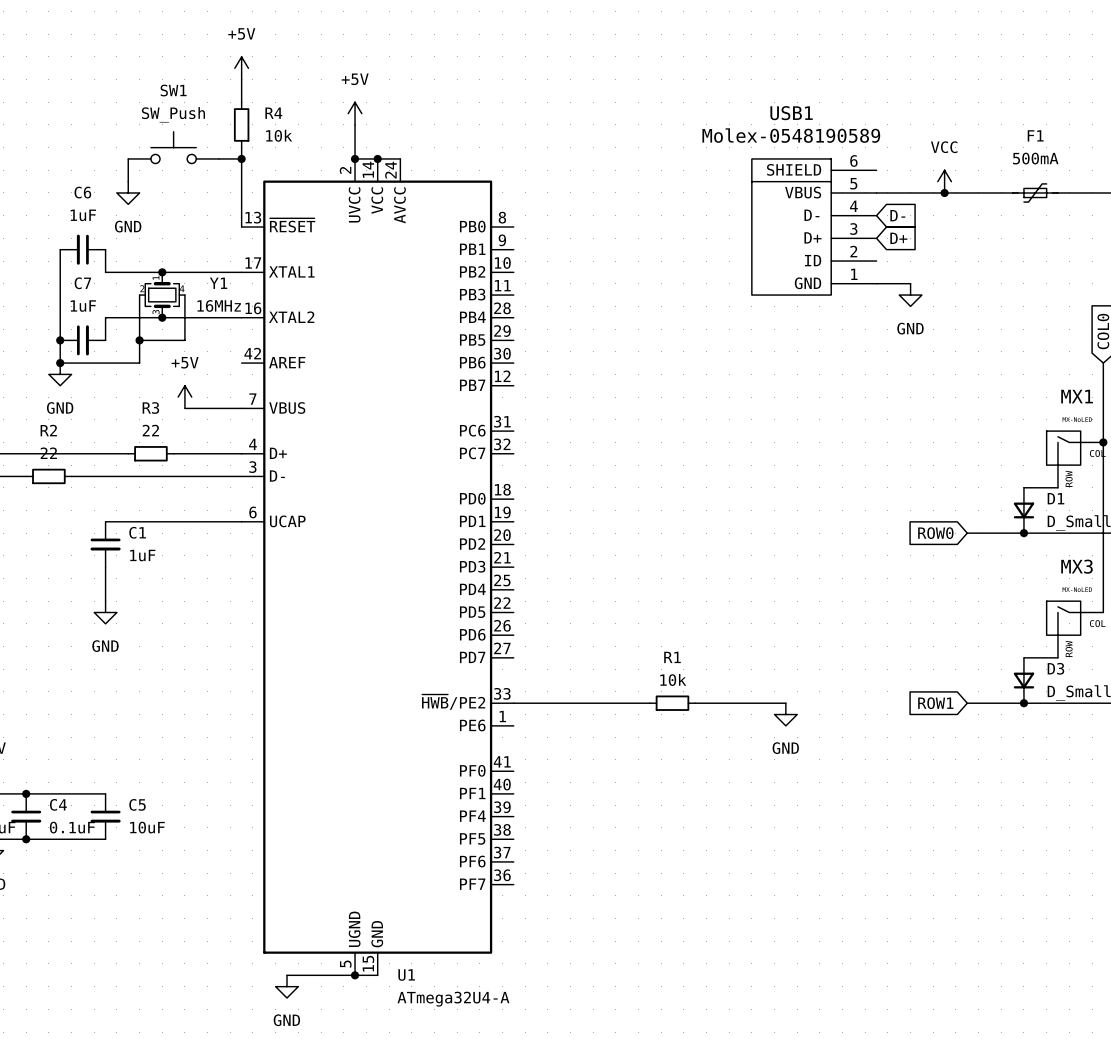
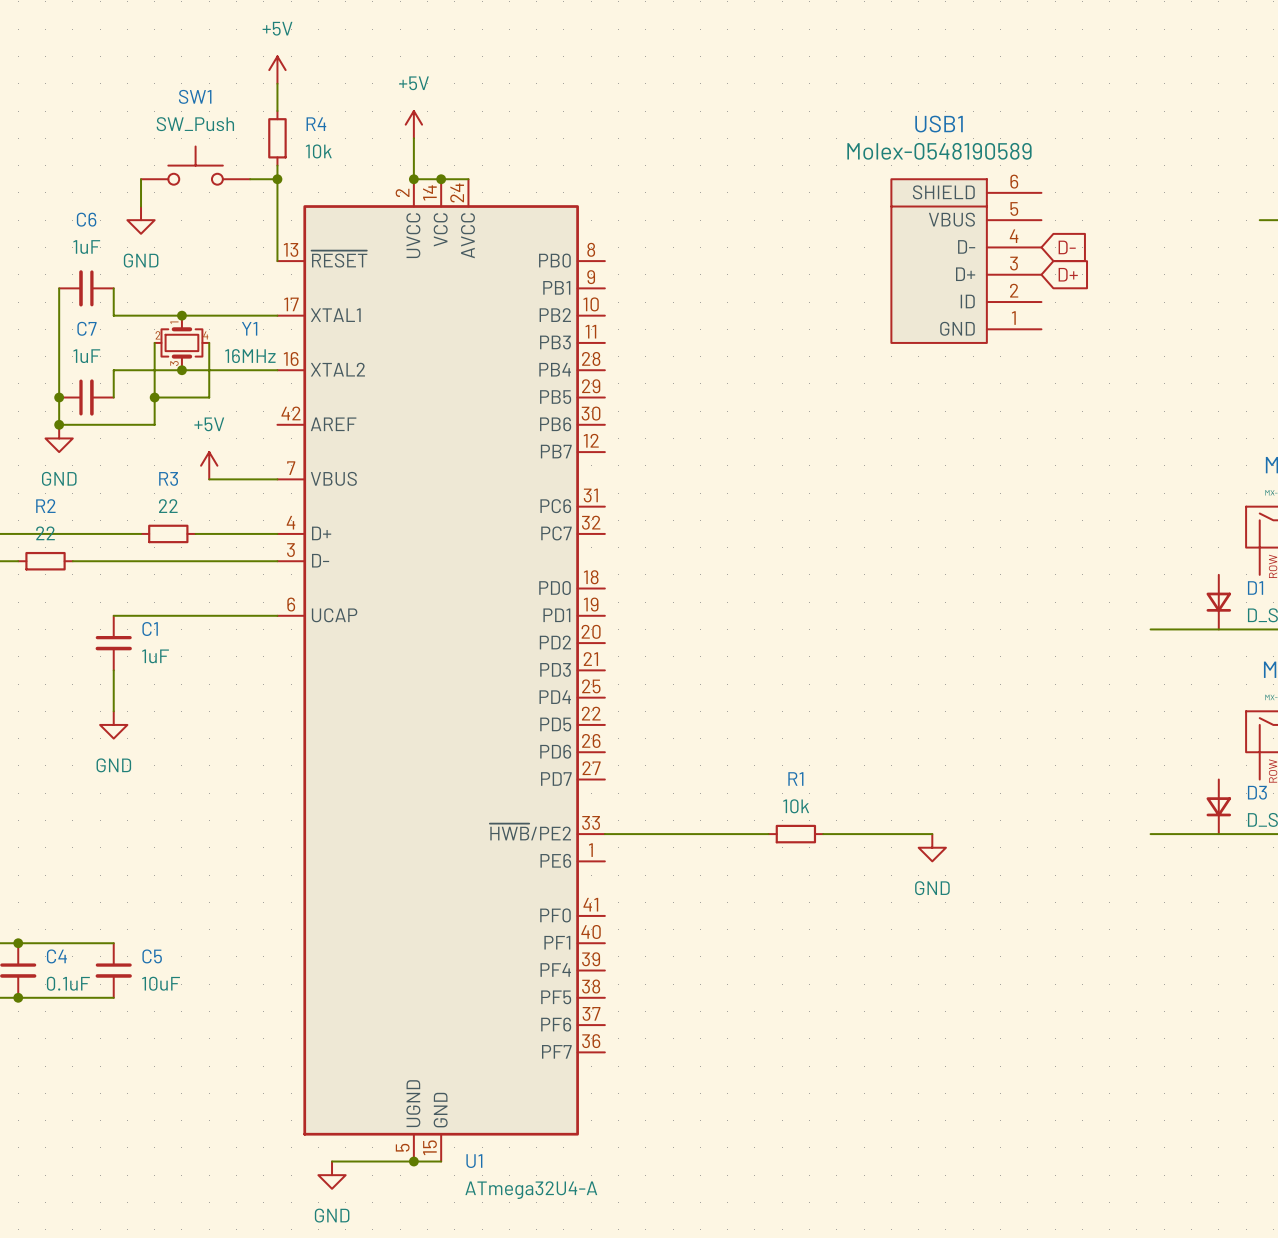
power symbol: VCC (944, 181) -> none
wire: (876, 192) (1012, 192) -> none
junction: (944, 192) -> none
F1: 500mA (1035, 192) -> none
wire: (876, 283) (910, 283) -> none
power symbol: GND (910, 295) -> none
wire: (1023, 487) (1057, 487) -> none
global label: ROW0 (935, 533) -> none
junction: (1023, 533) -> none
wire: (1023, 657) (1057, 657) -> none
global label: ROW1 (935, 703) -> none
junction: (1023, 703) -> none

